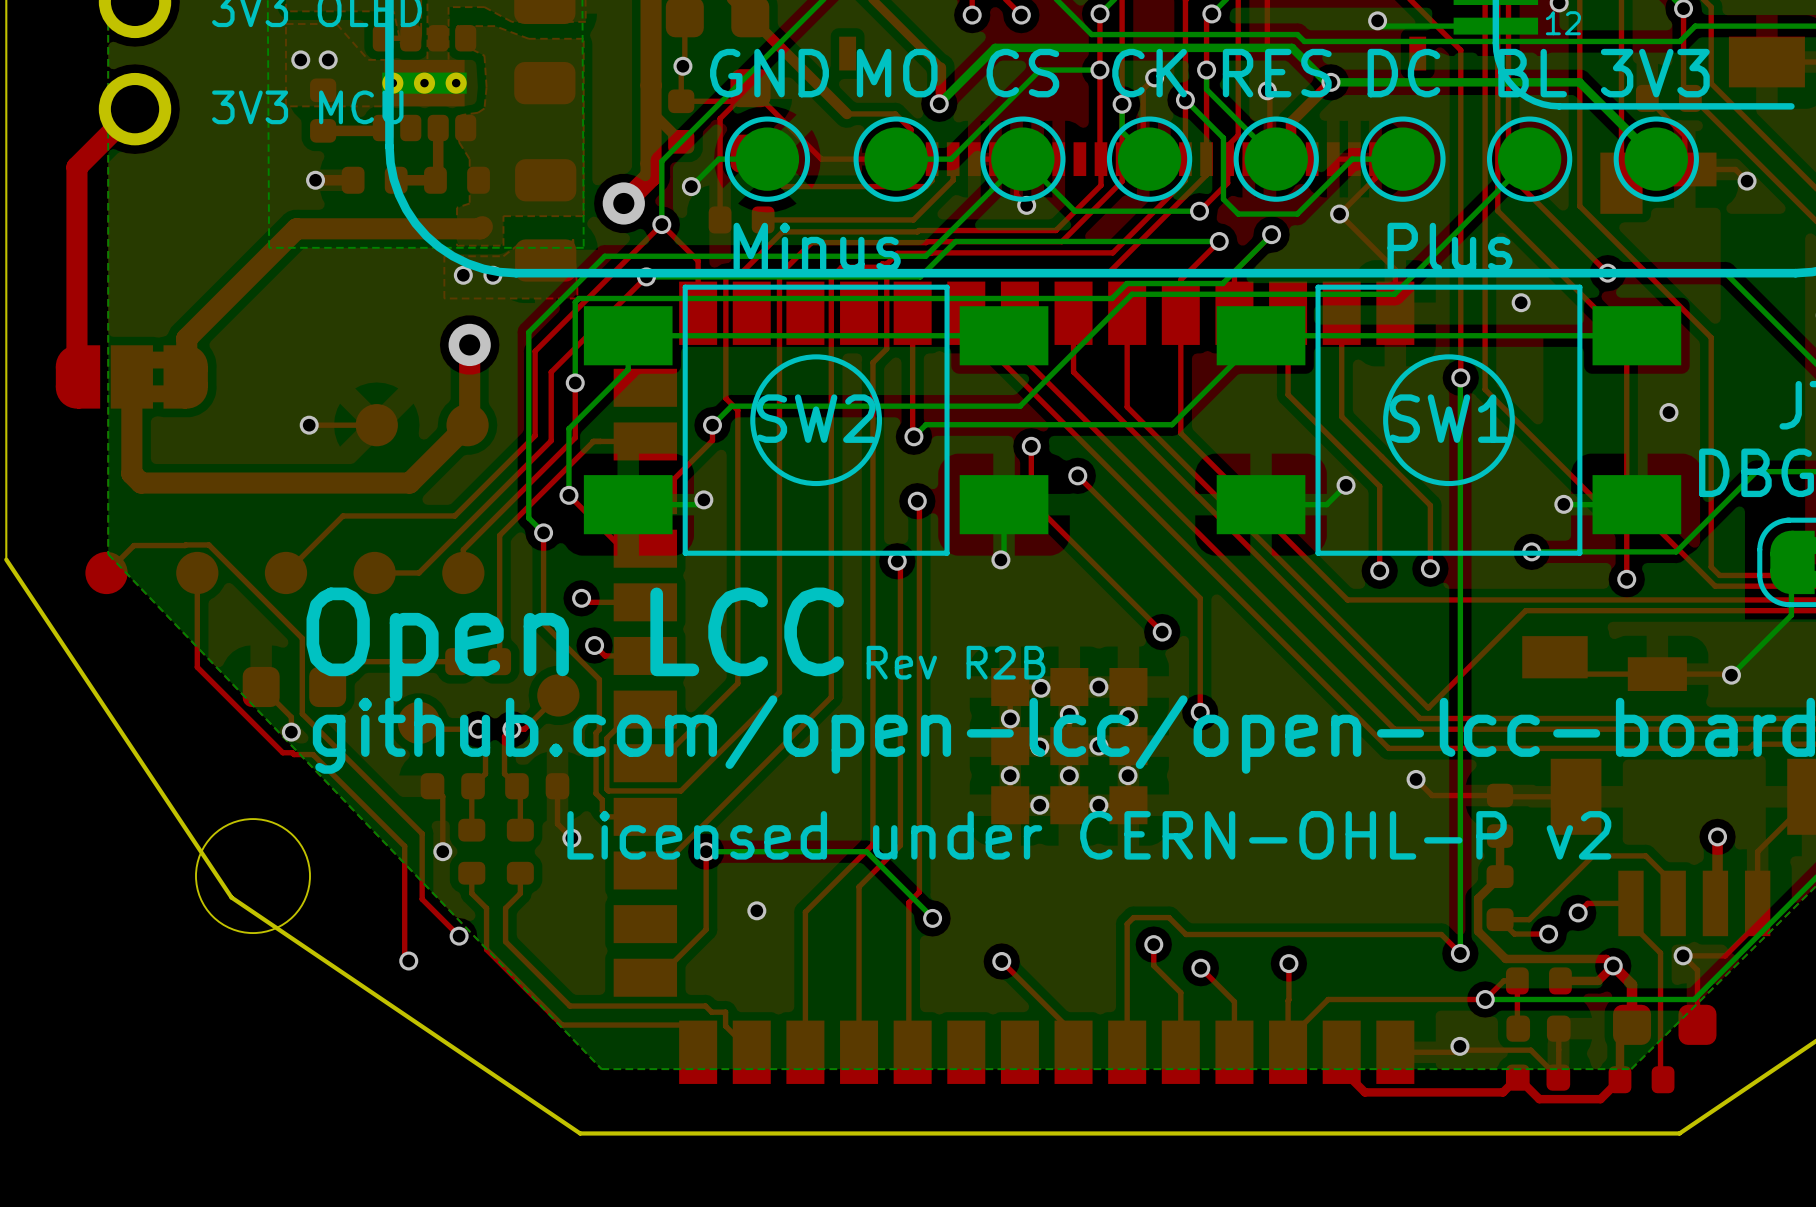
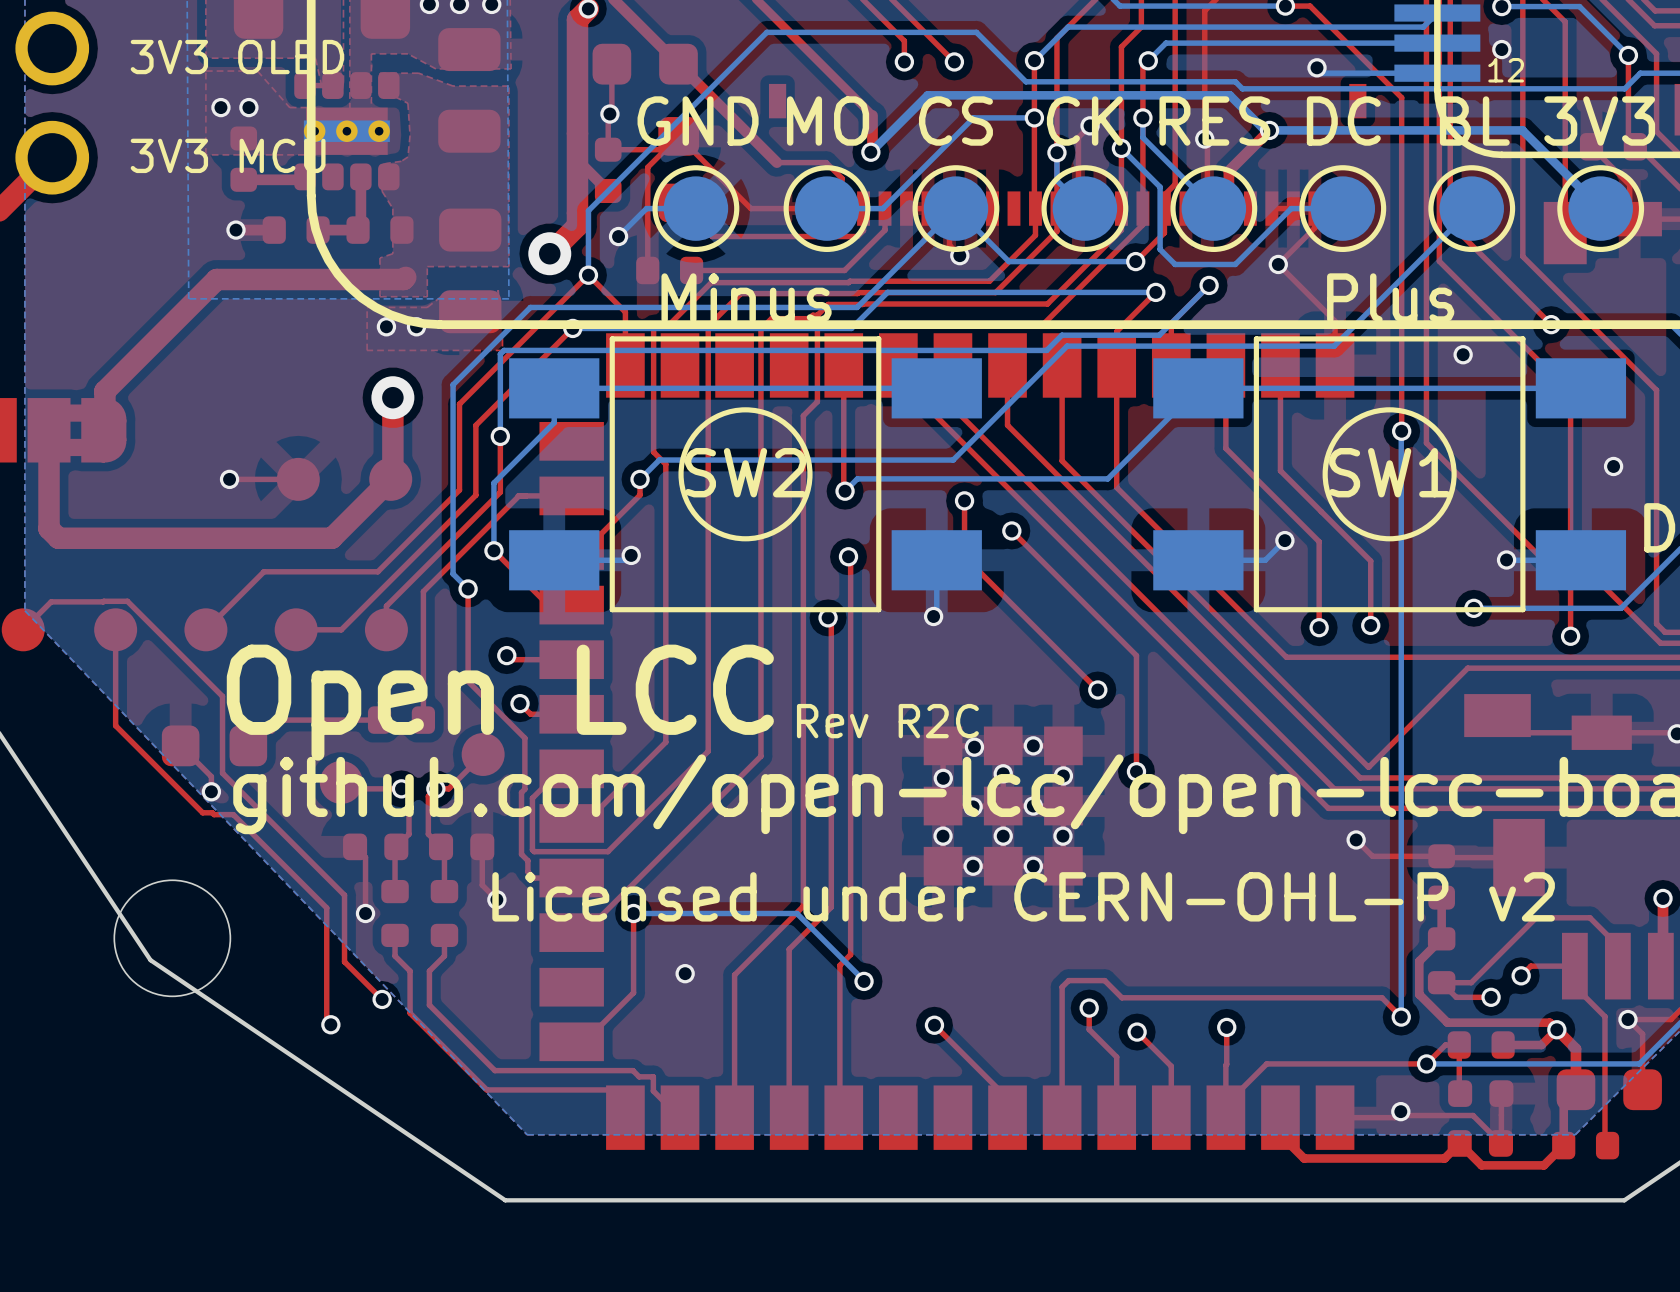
text: Rev R2B (956, 662) -> Rev R2C (887, 721)

